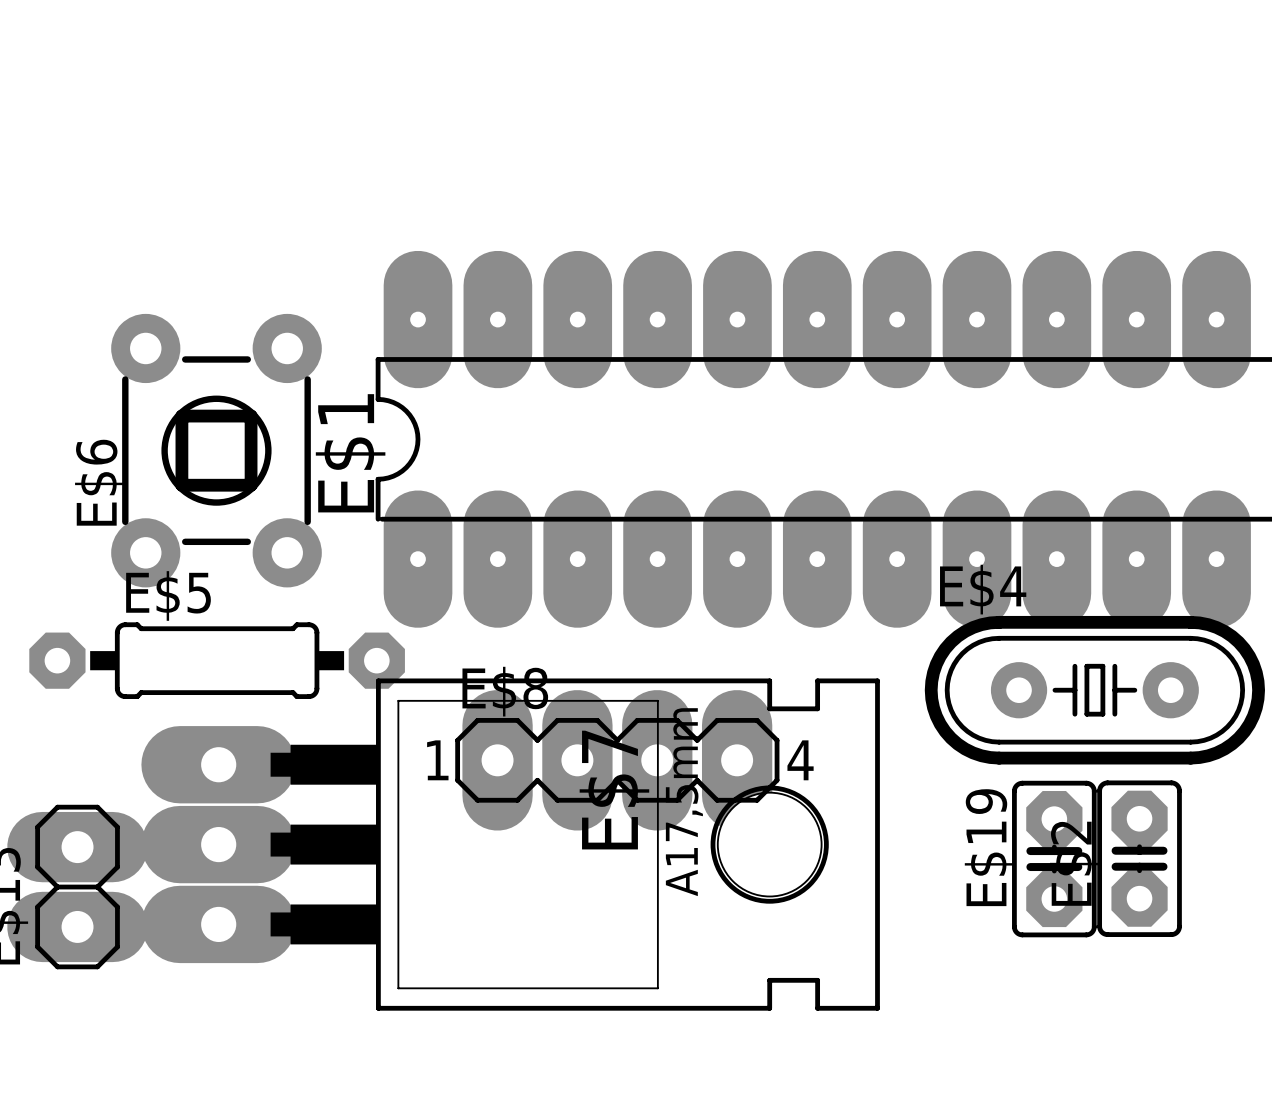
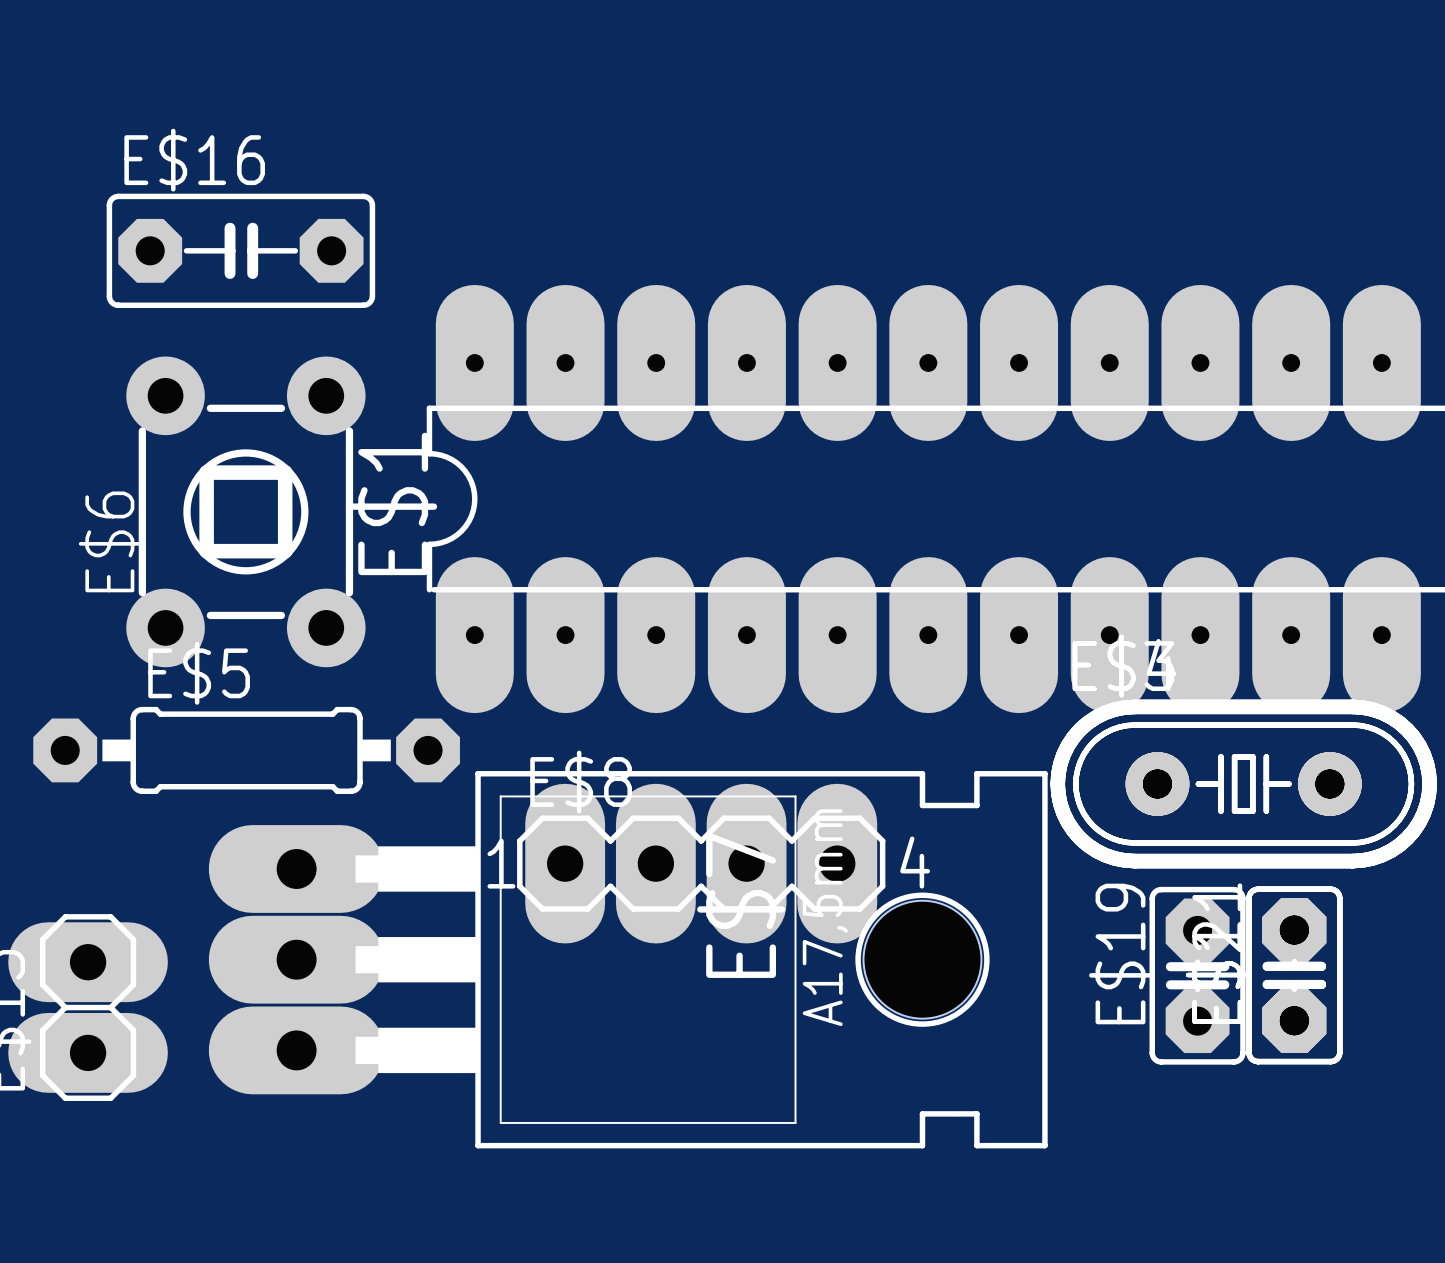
E$16: none -> (240, 250)
part: none -> (1243, 784)
E$7 position: (510, 844) -> (628, 959)
part: none -> (1294, 975)

